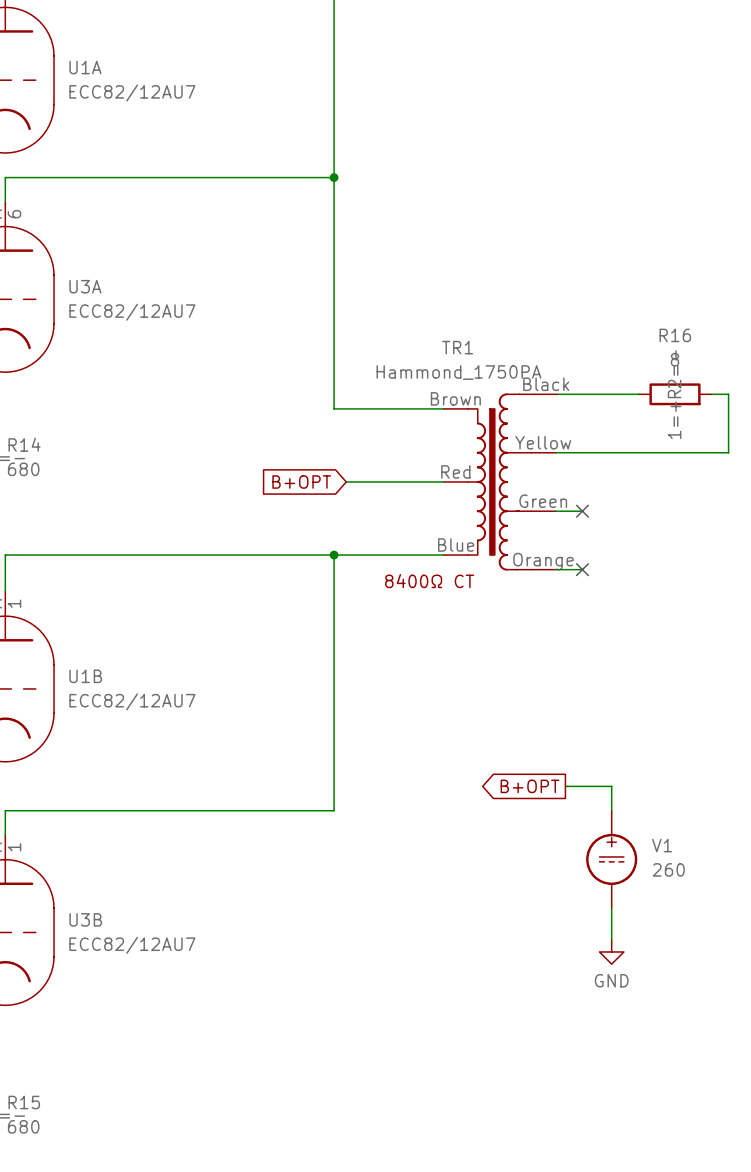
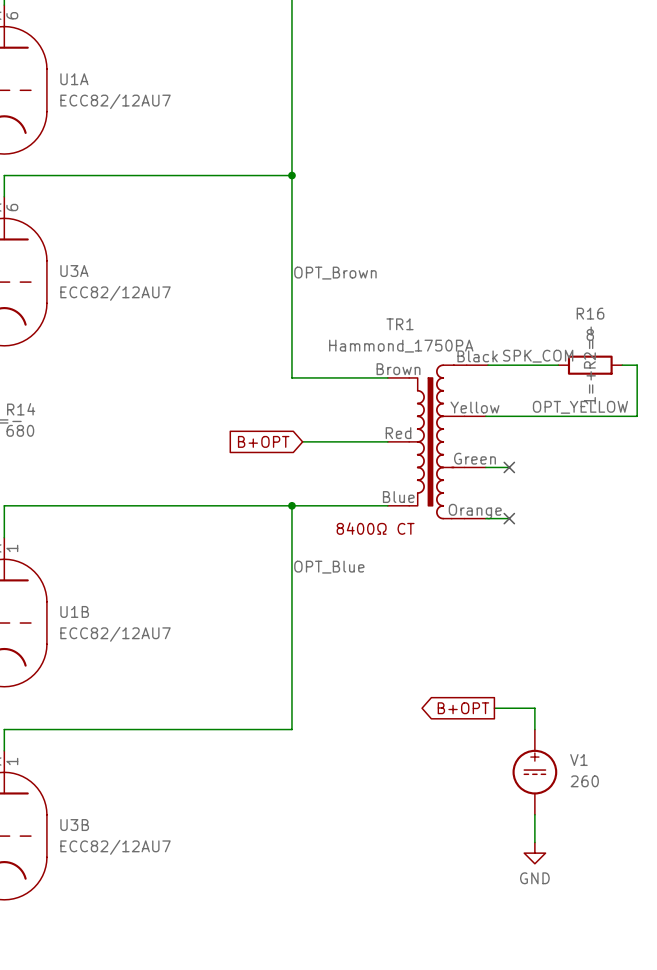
label: none -> OPT_Brown (335, 273)
label: none -> SPK_COM (538, 356)
label: none -> OPT_YELLOW (580, 407)
label: none -> OPT_Blue (329, 567)

